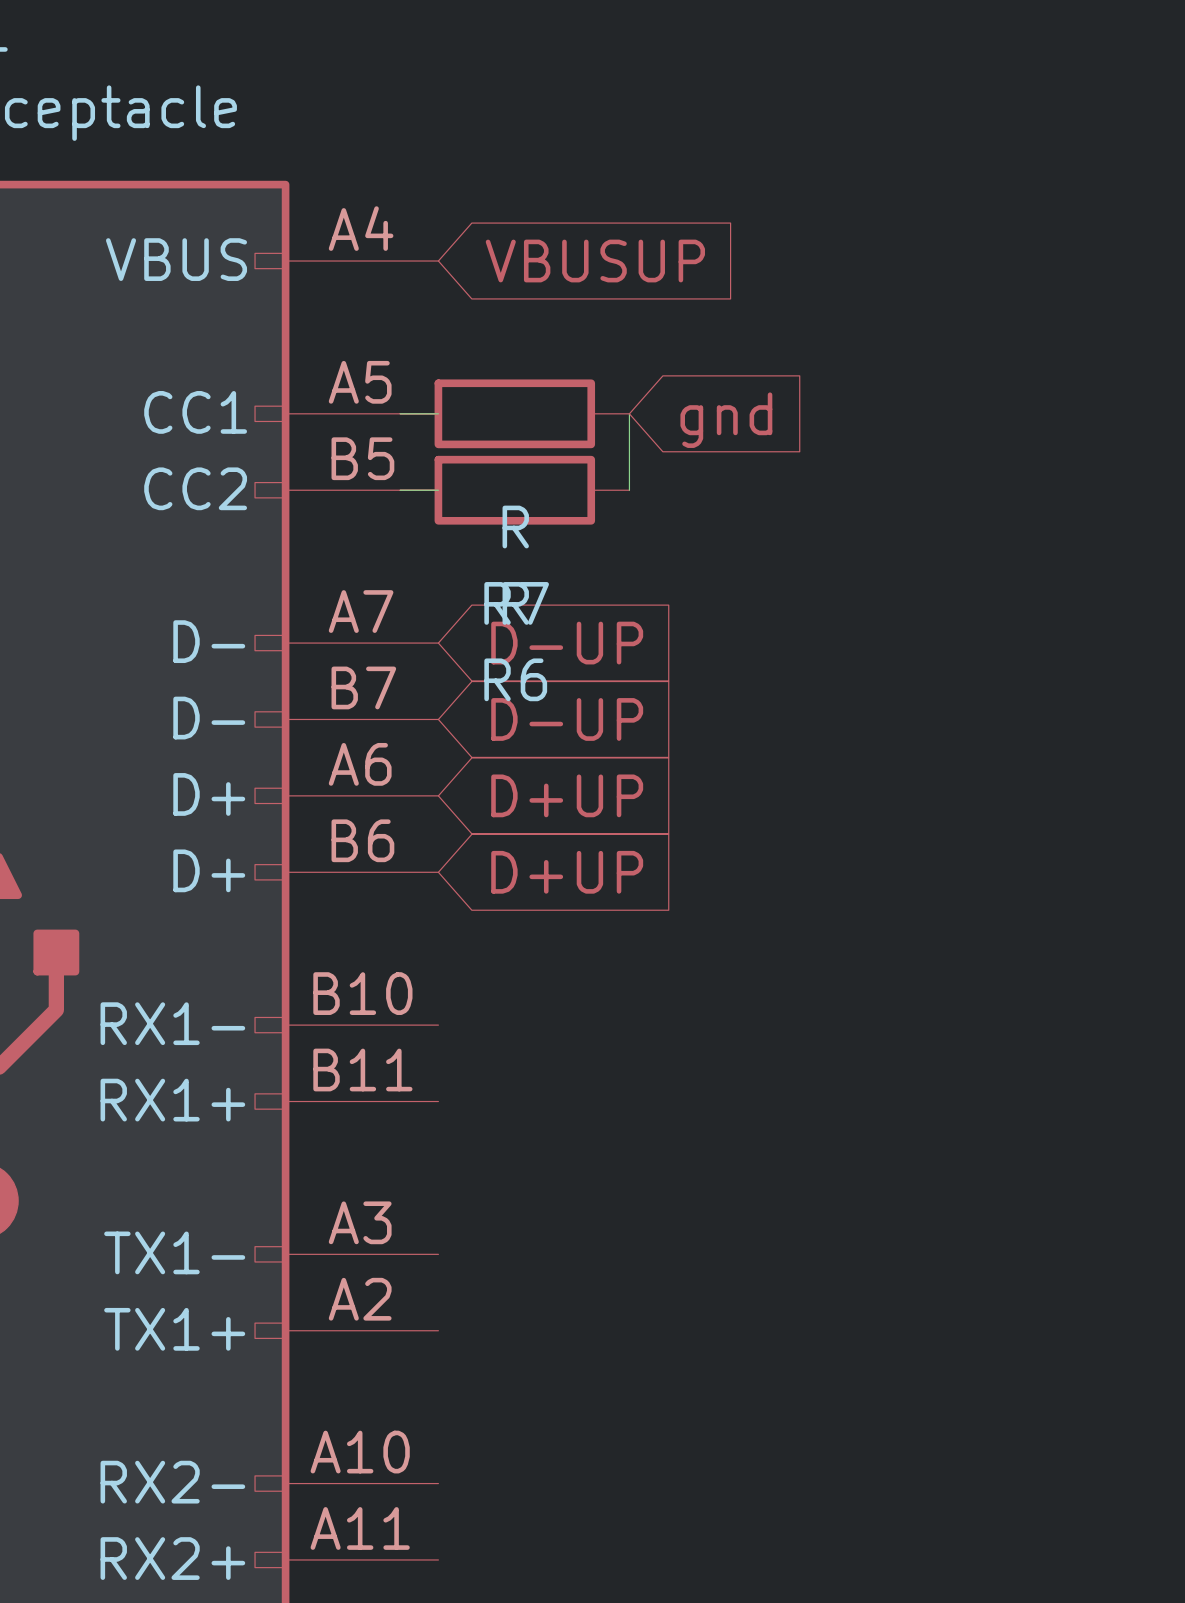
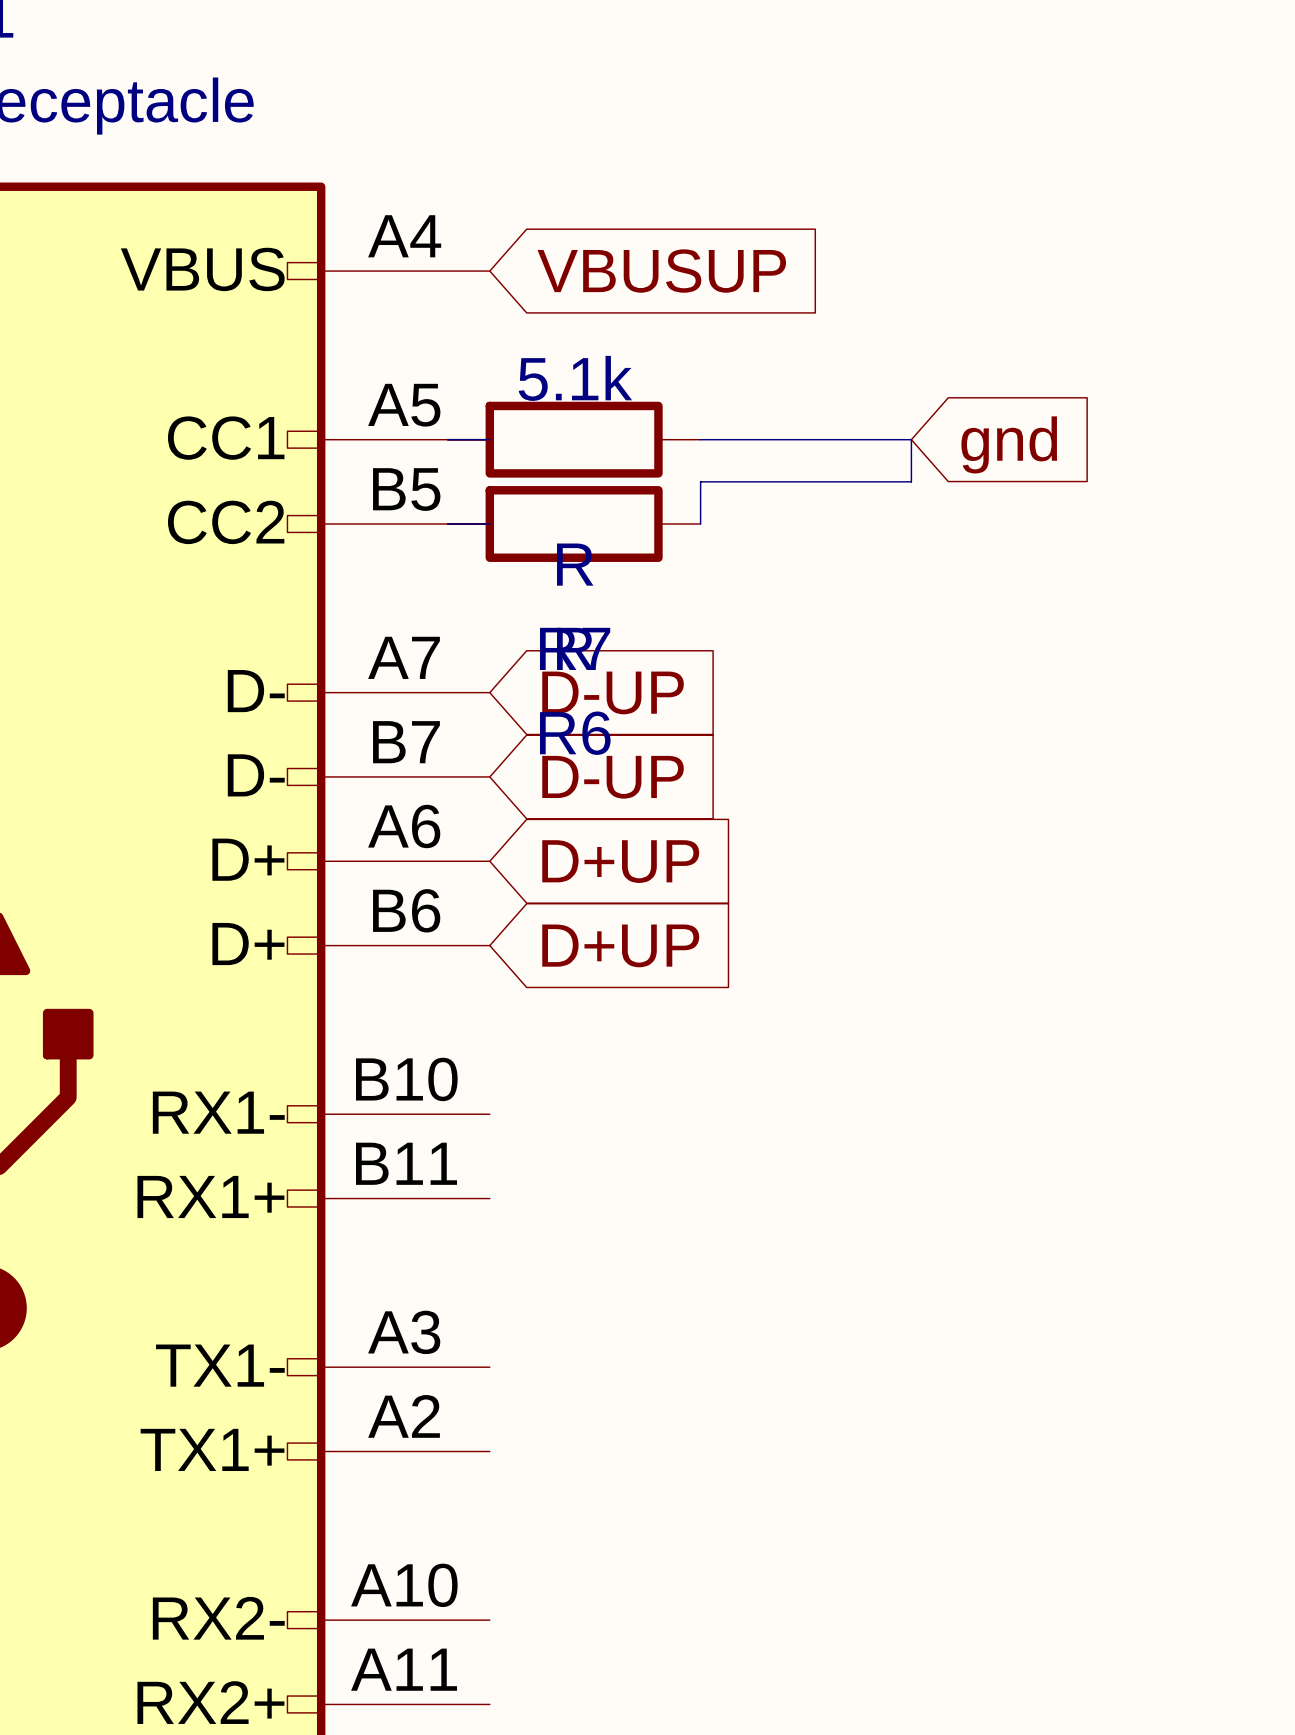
text: none -> 5.1k (575, 378)
wire: (629, 413) (629, 452) -> (700, 439) (911, 439) (911, 481) (700, 481)
global label position: gnd (726, 420) -> gnd (1009, 444)

